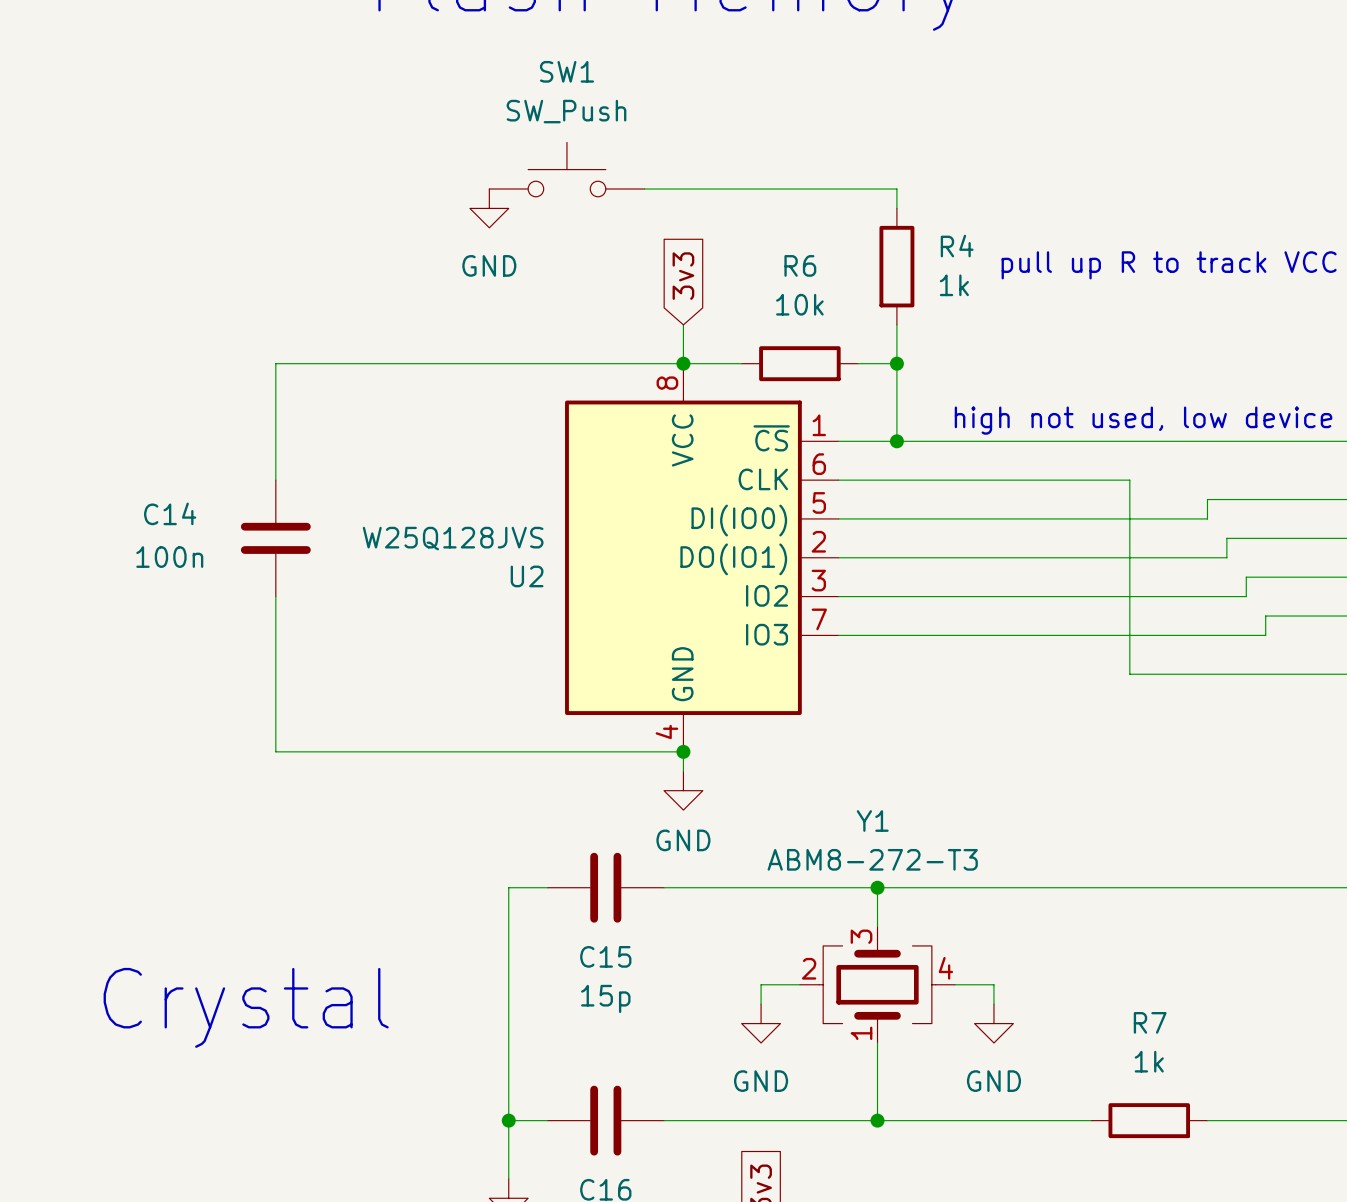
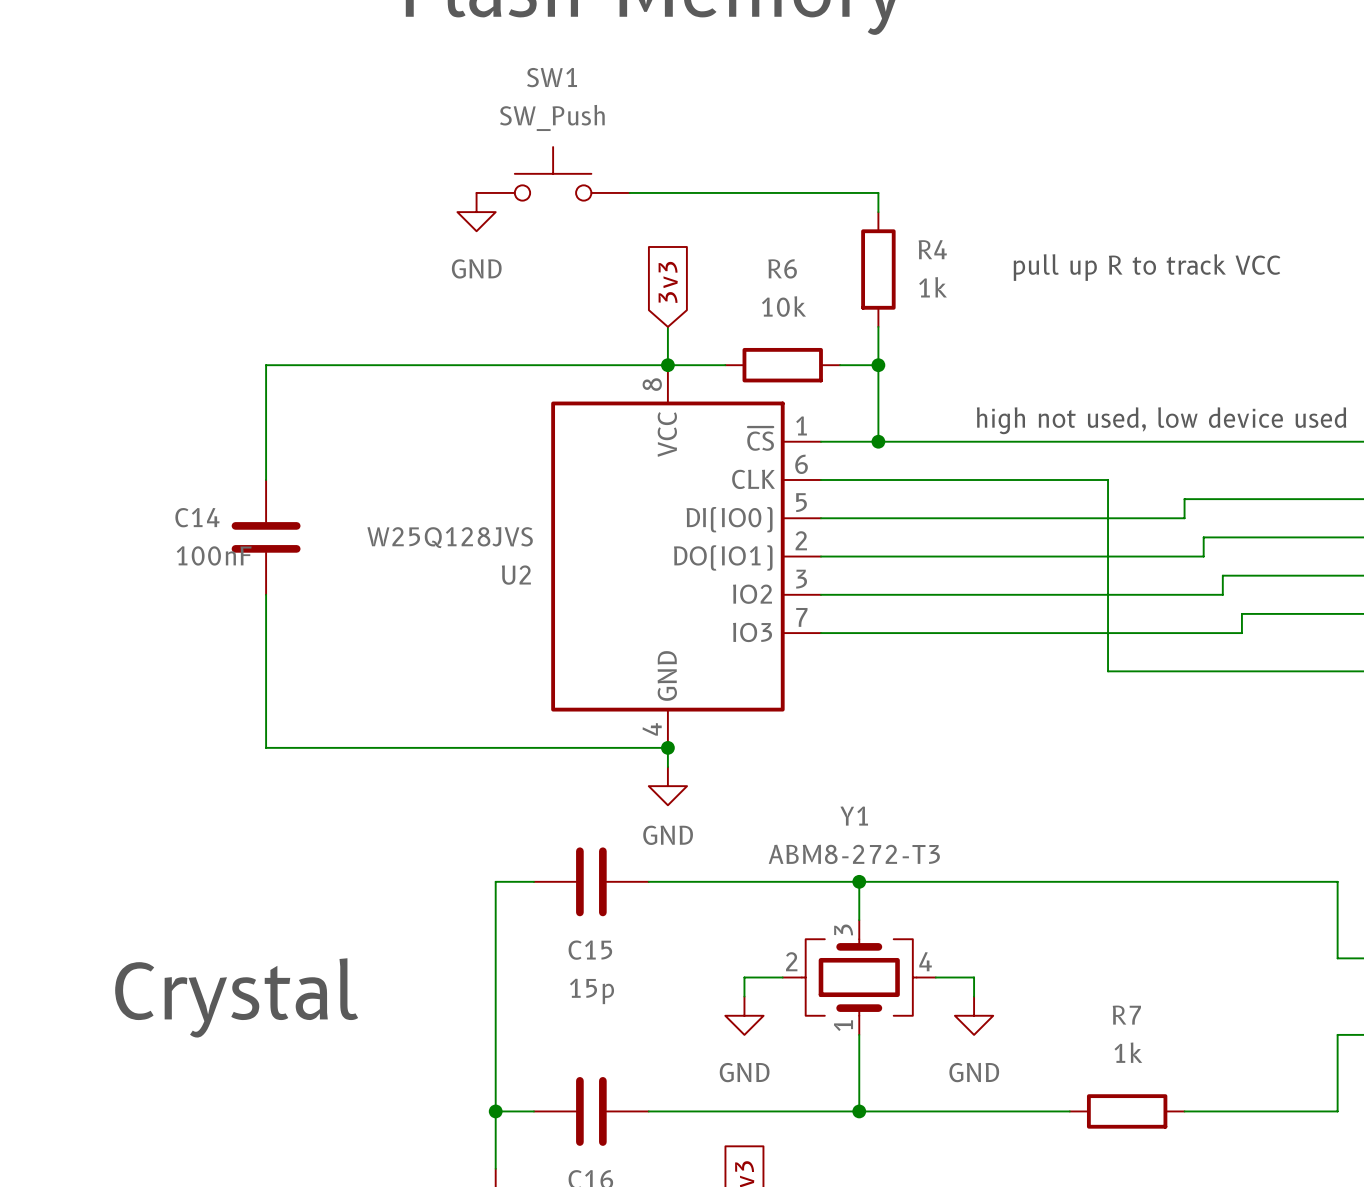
C14 name position: C14 (170, 513) -> C14 (197, 517)
C14 value: 100n (169, 557) -> 100nF (214, 555)

